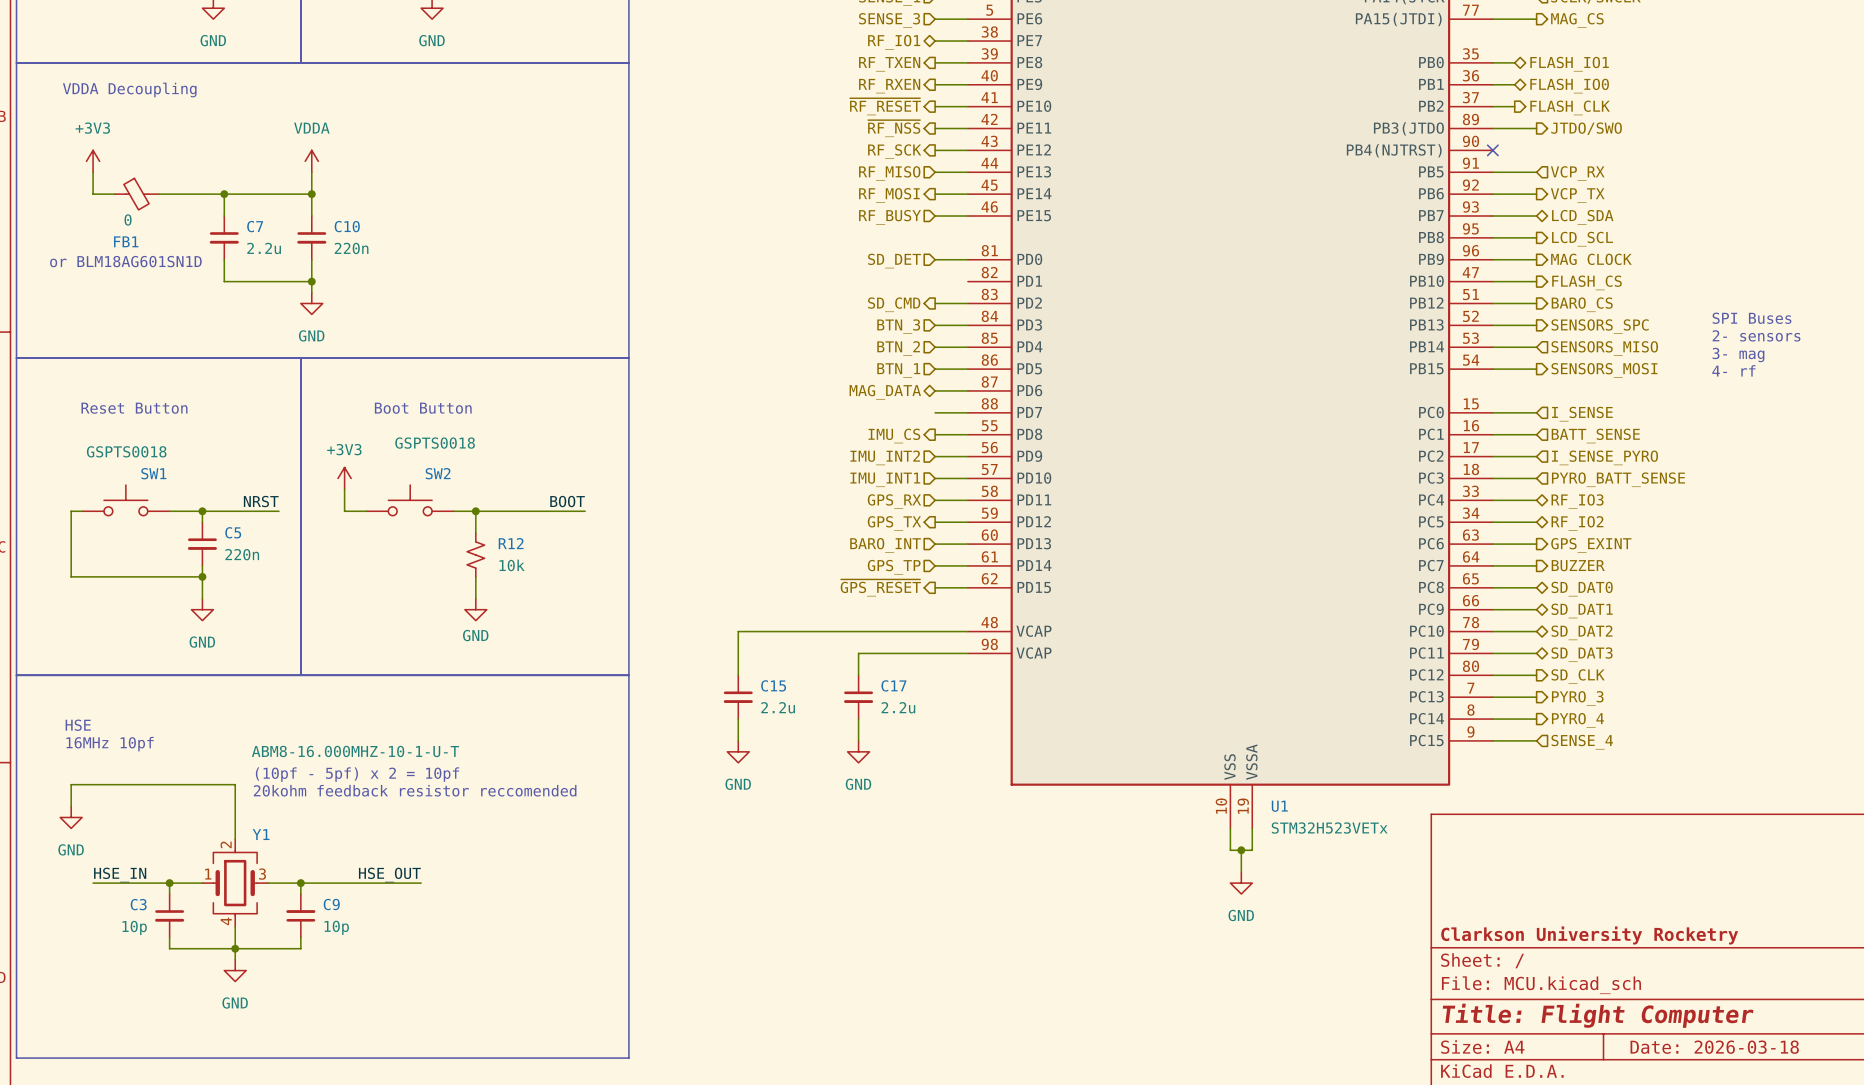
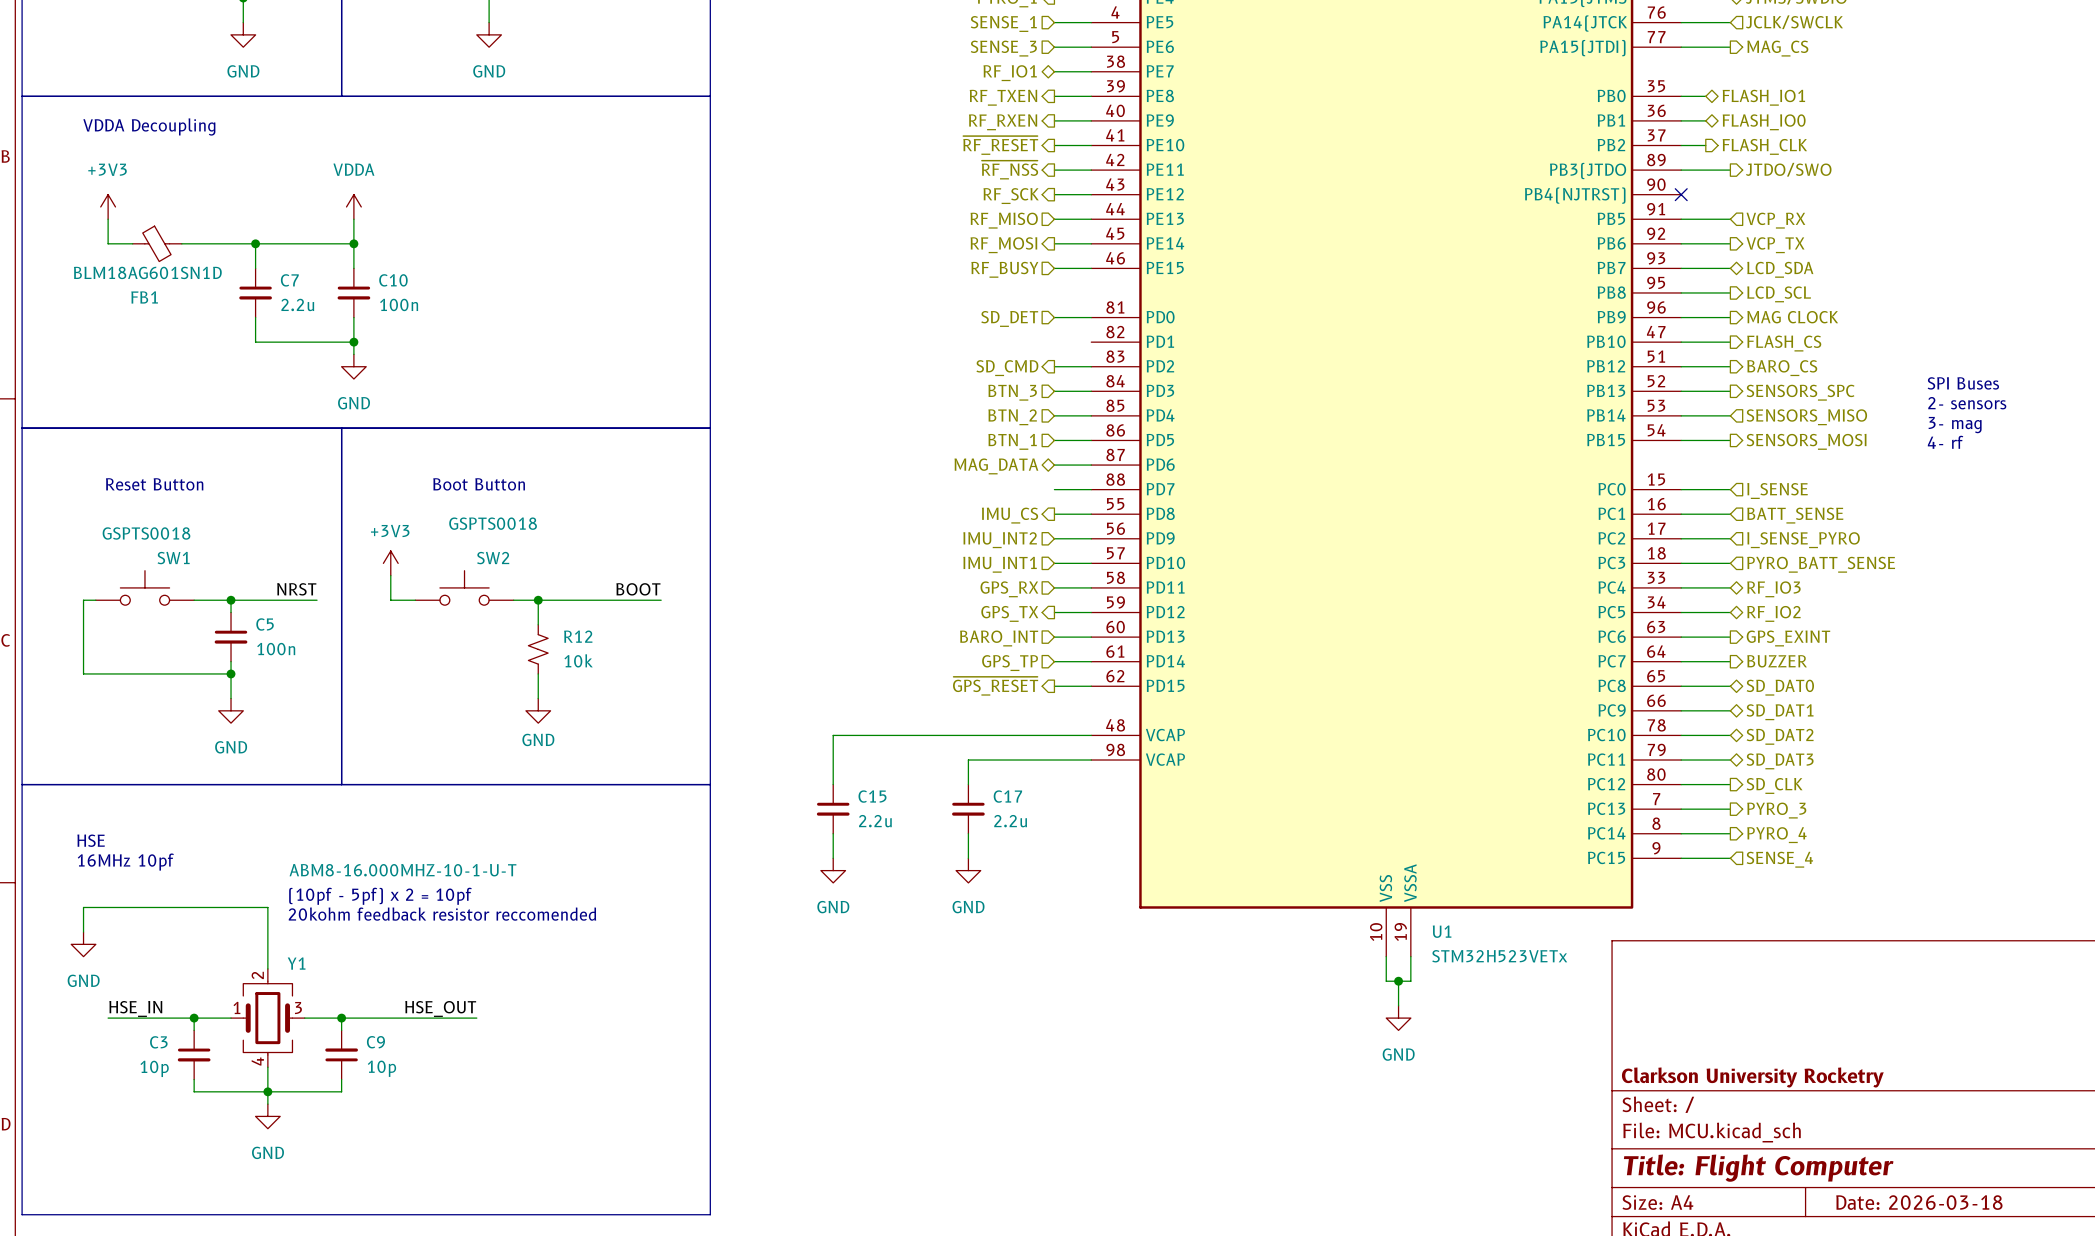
FB1 value: 0 (128, 219) -> BLM18AG601SN1D (147, 272)
C10 value: 220n (351, 248) -> 100n (399, 304)
text: or BLM18AG601SN1D (125, 261) -> none
C5 value: 220n (242, 554) -> 100n (276, 649)

